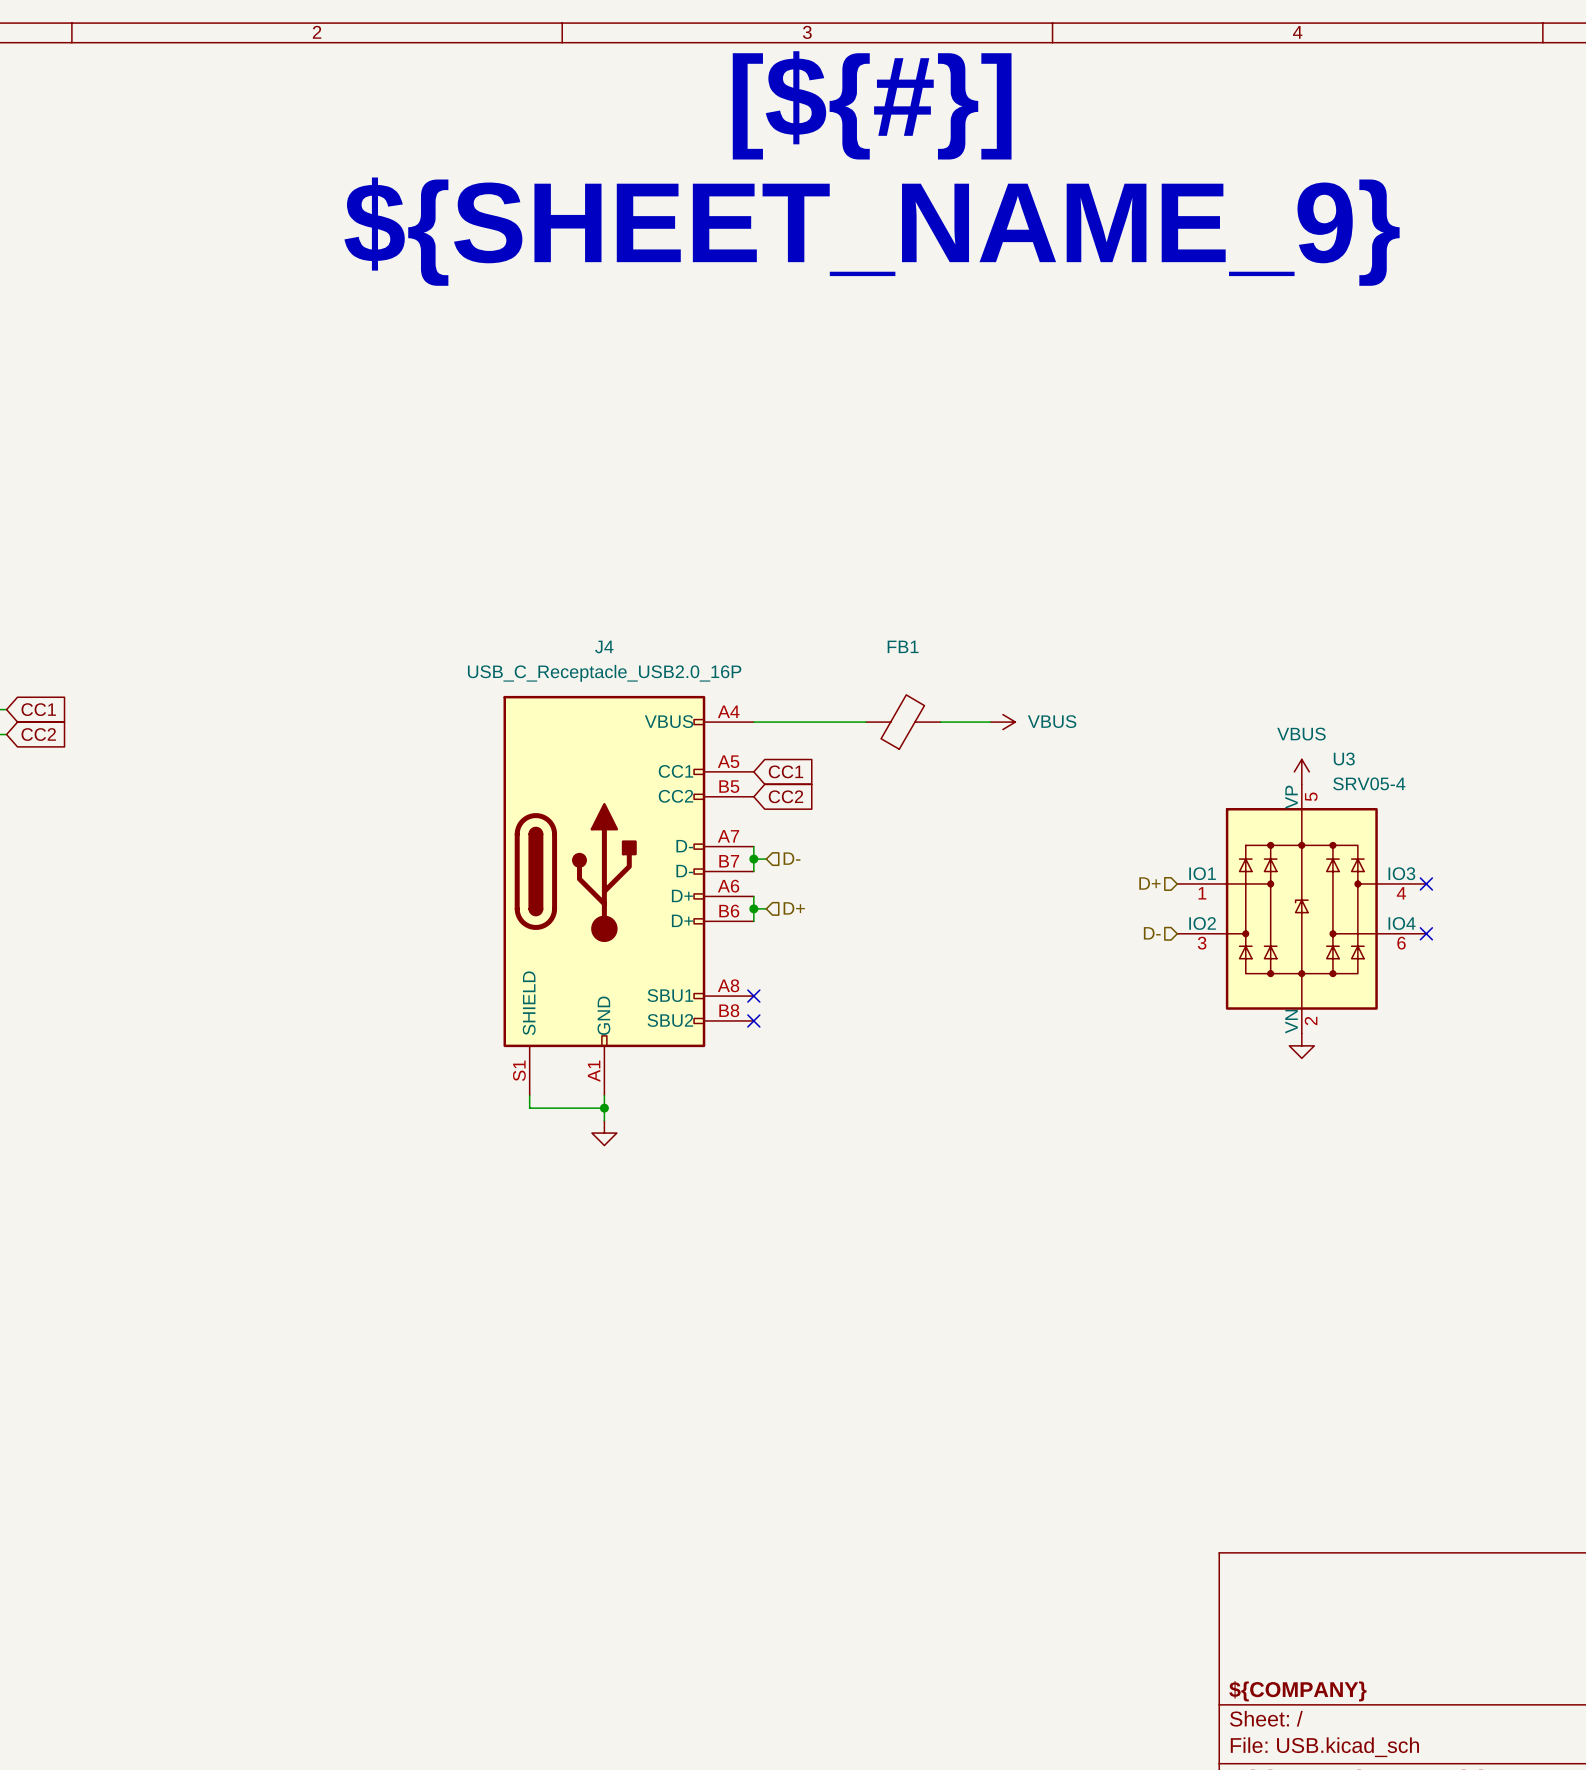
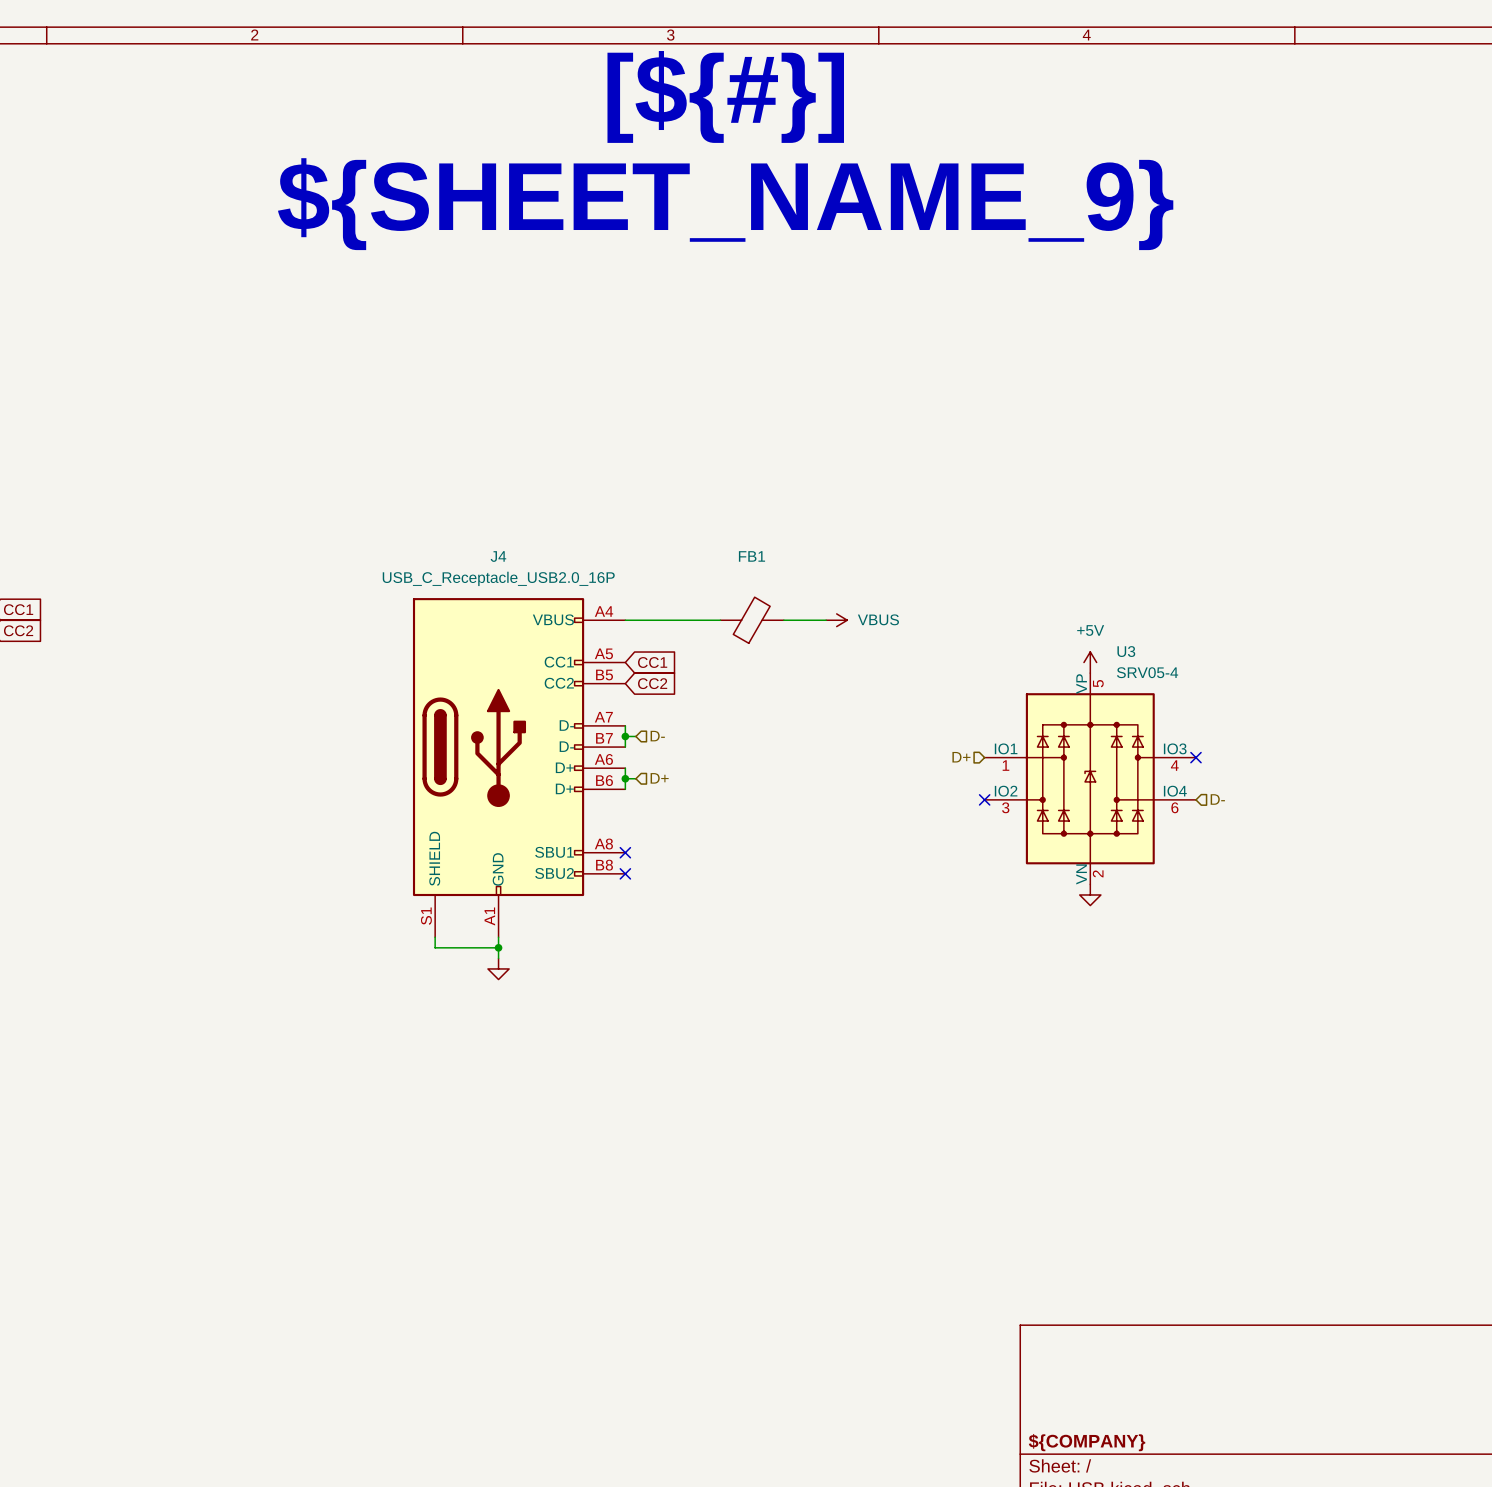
power symbol: VBUS (1301, 771) -> +5V (1090, 662)
hierarchical label: D- (1152, 933) -> none
no-connect mark: none -> (984, 799)
no-connect mark: (1426, 933) -> none
hierarchical label: none -> D- (1217, 799)

